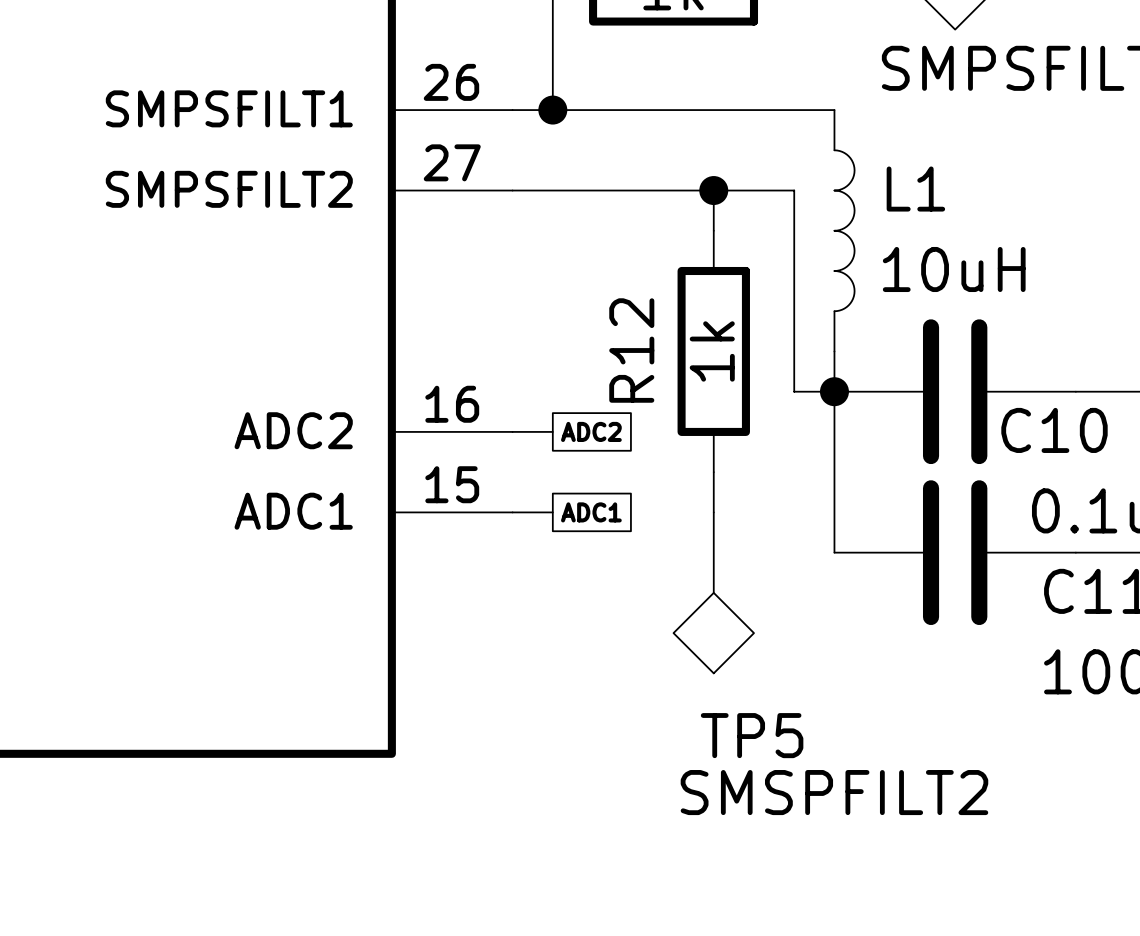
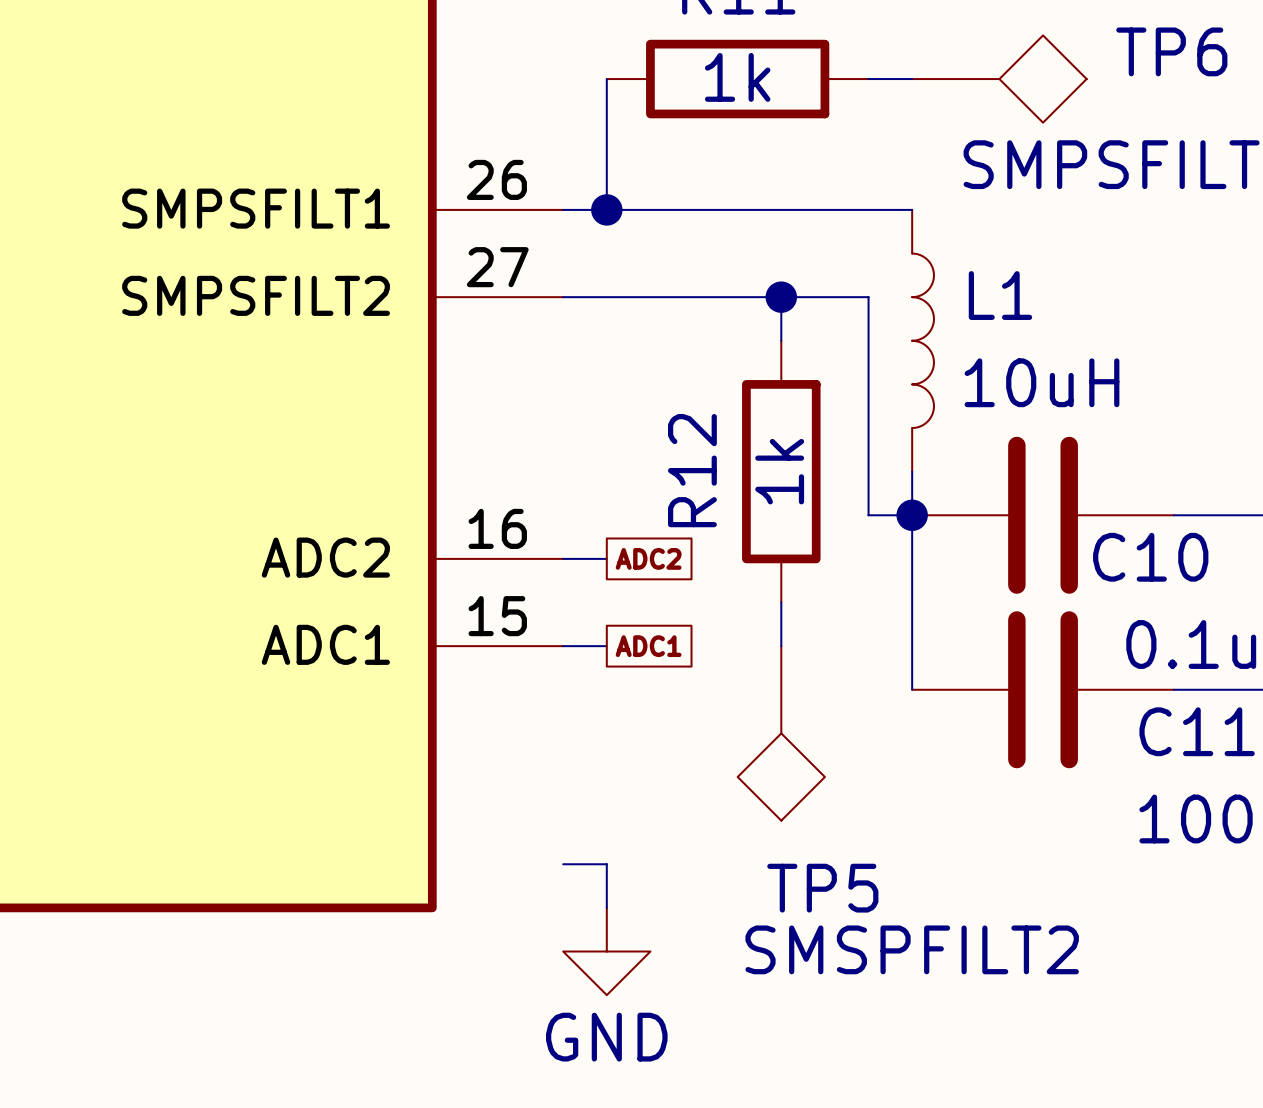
wire: none -> (563, 864) (606, 864) (606, 907)
power symbol: none -> GND (606, 951)

